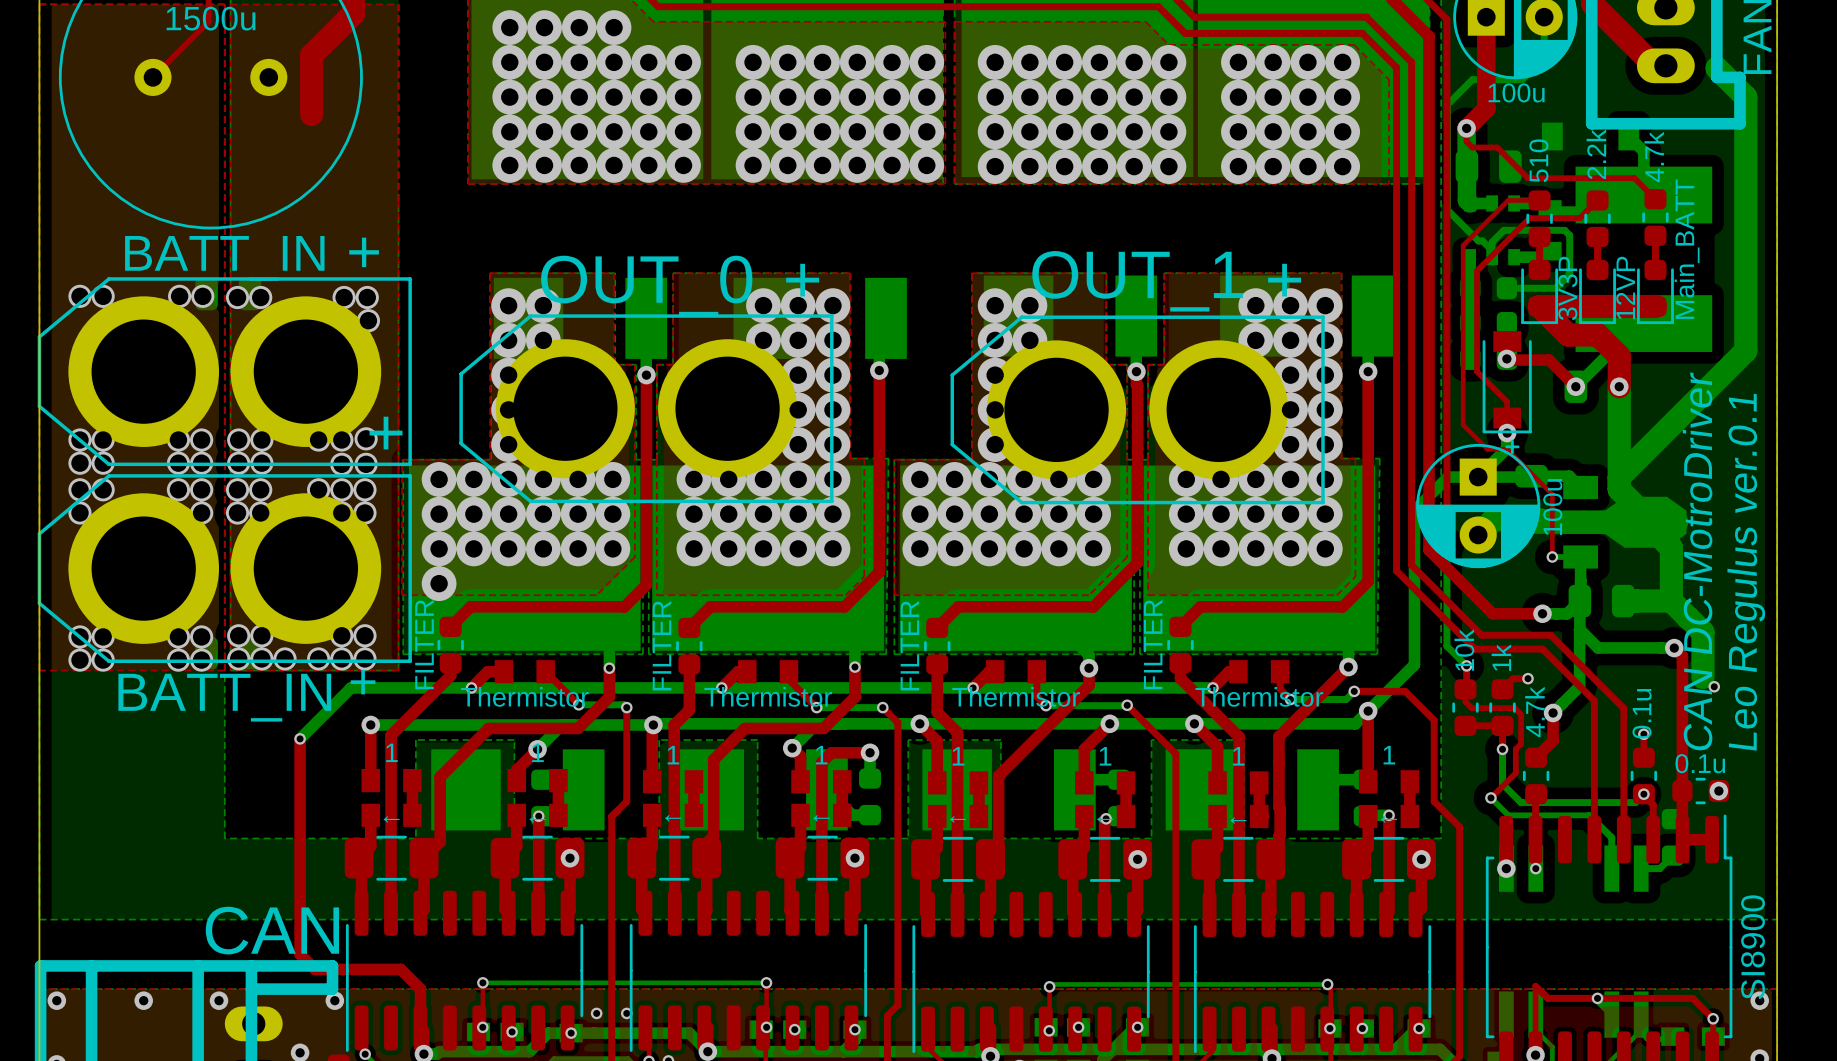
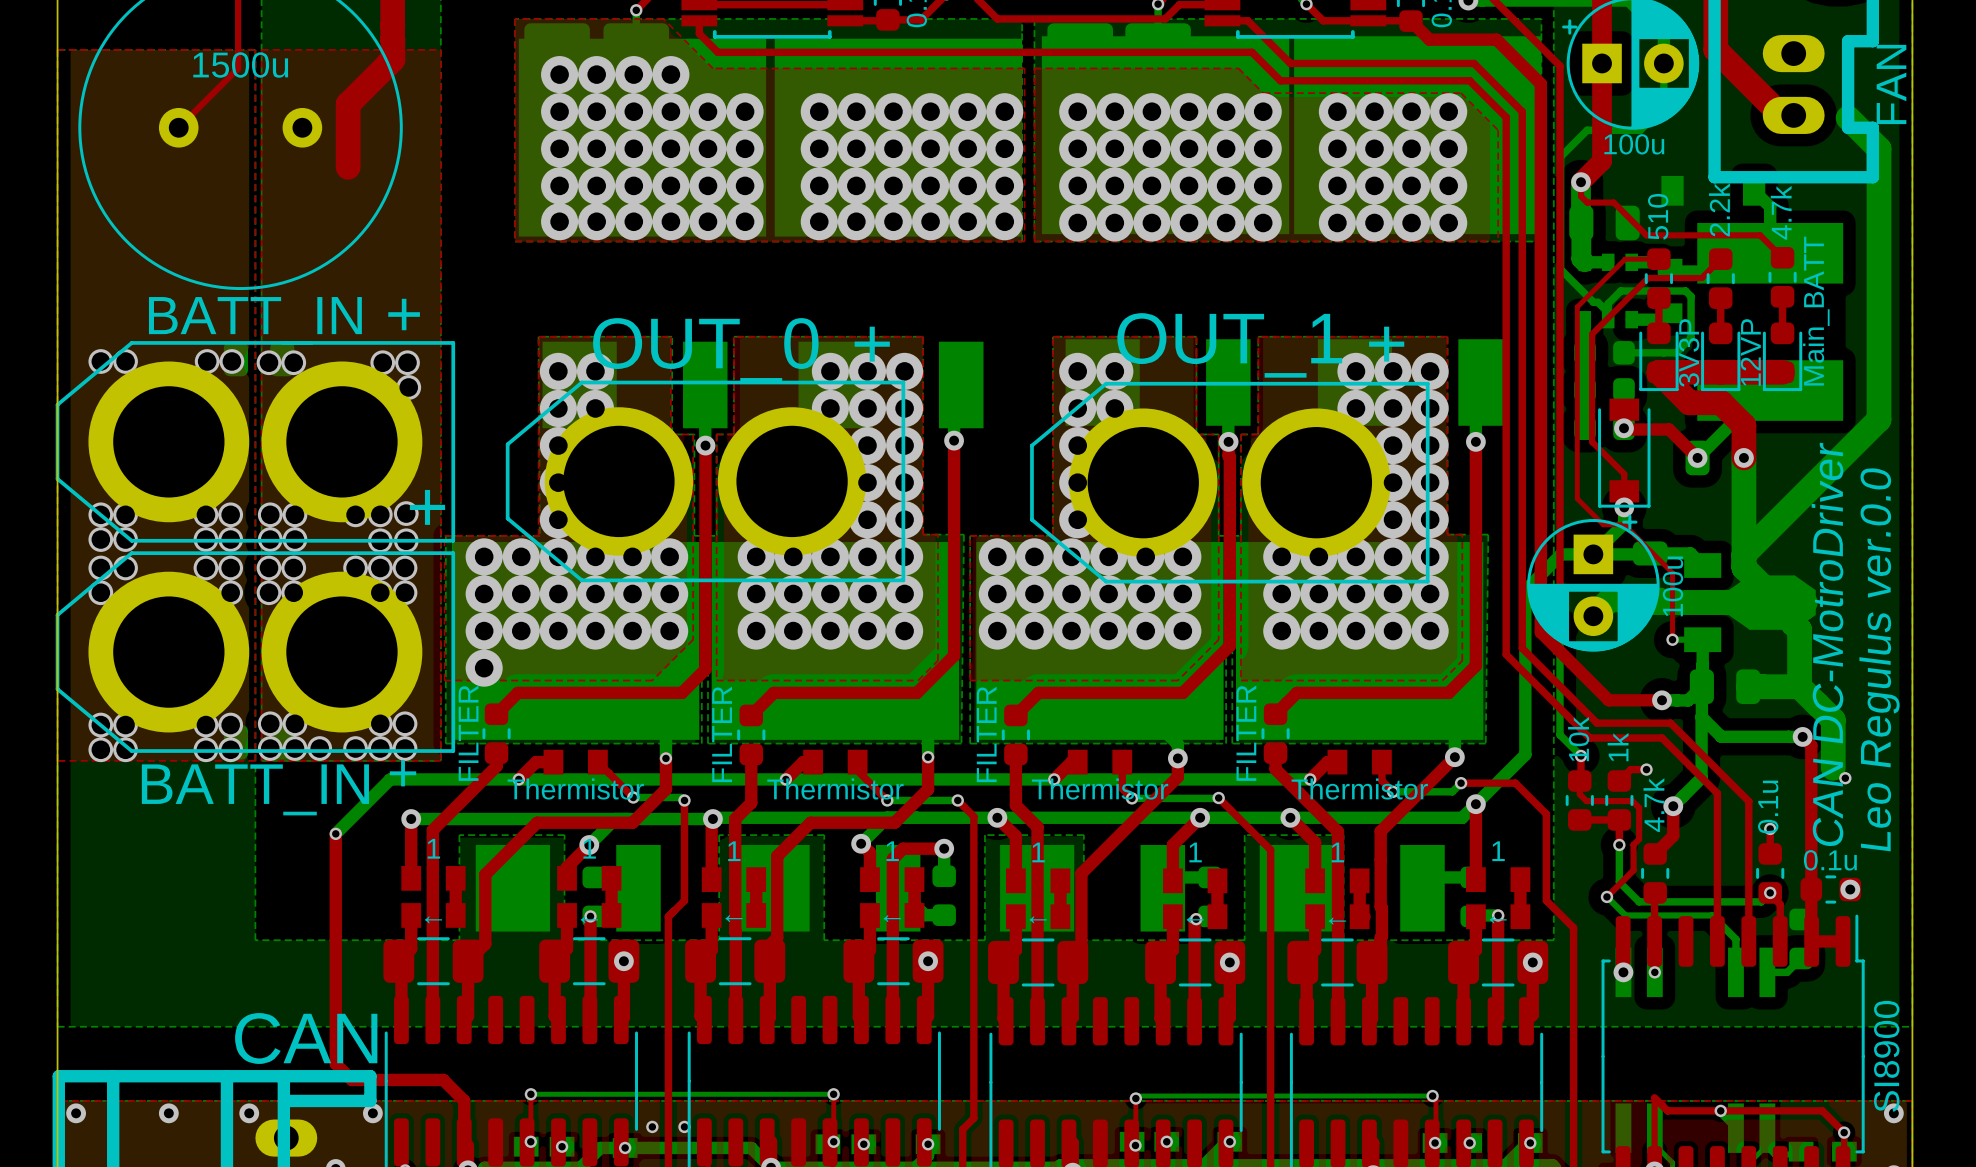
text: Leo Regulus ver.0.1 (1746, 572) -> Leo Regulus ver.0.0 (1879, 659)

